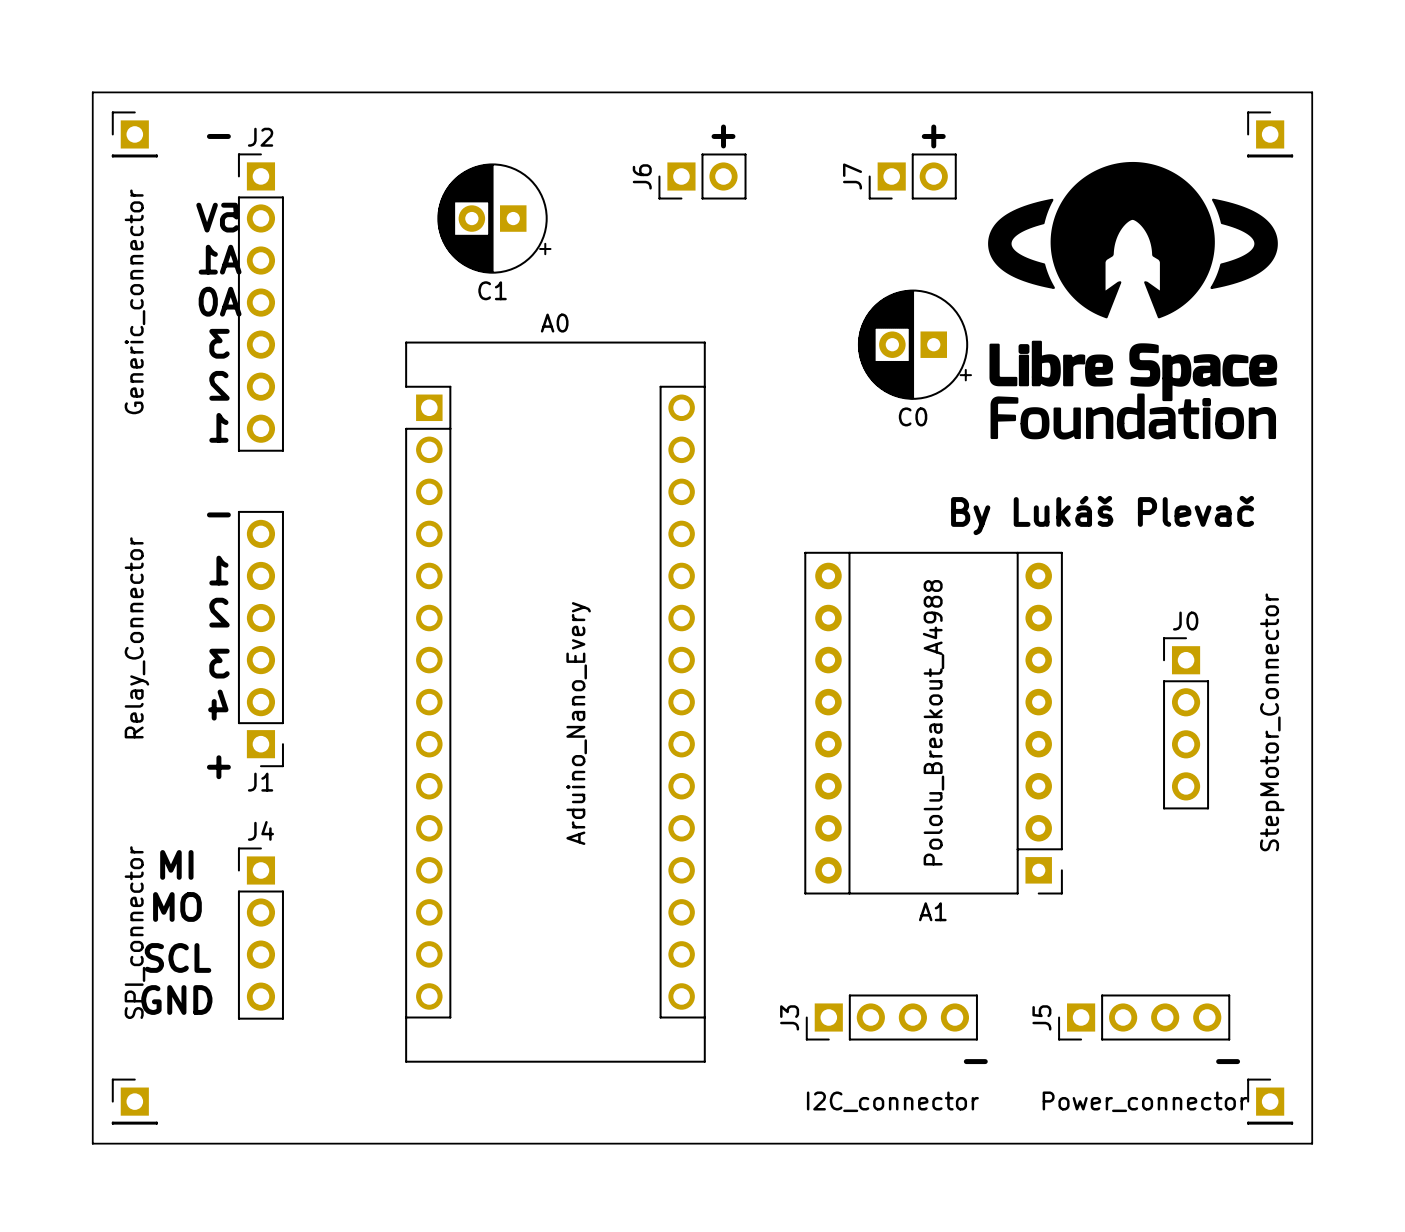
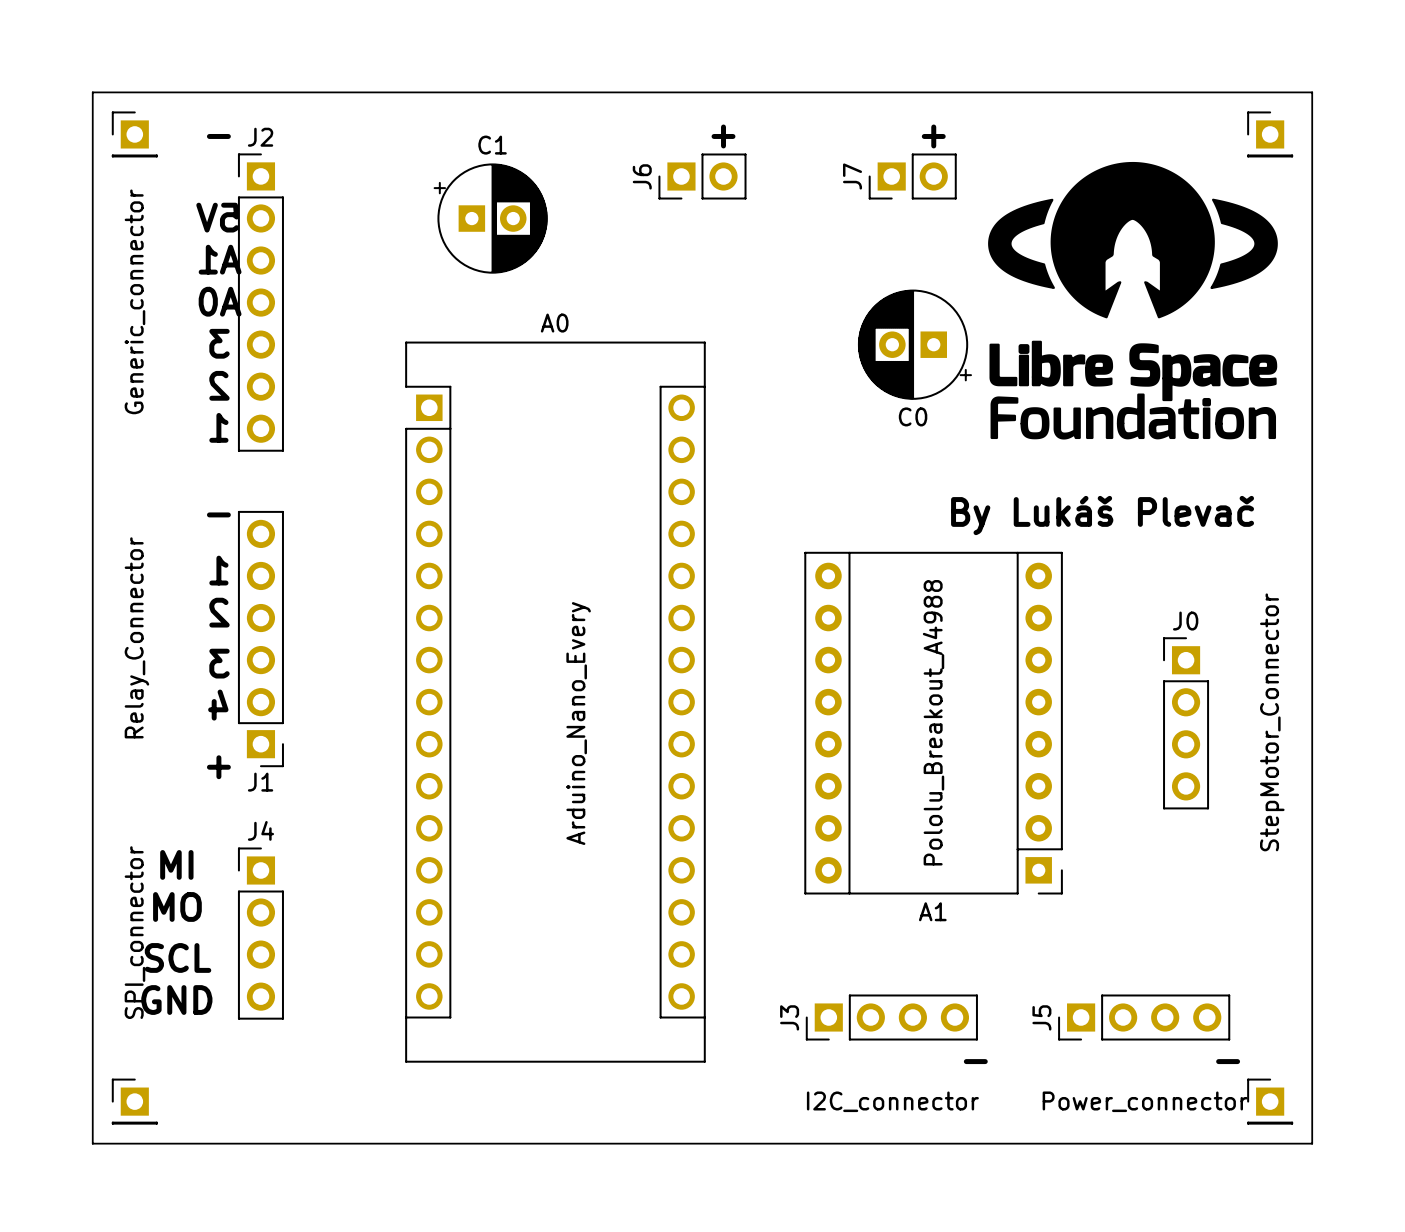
C1 rotation: 0° (494, 218) -> 180° (490, 218)

